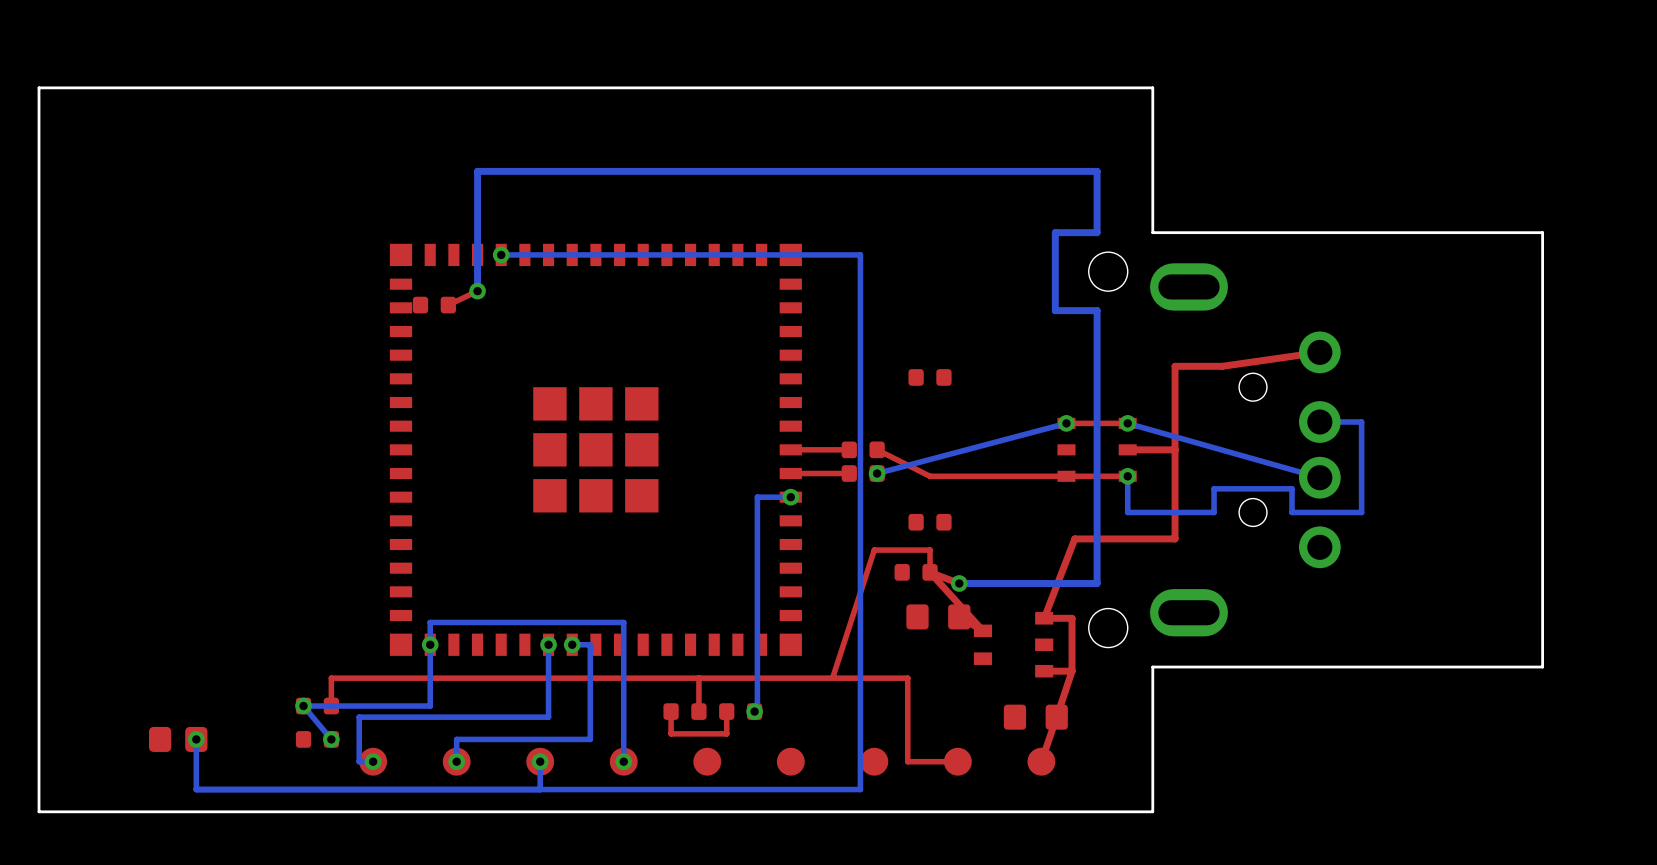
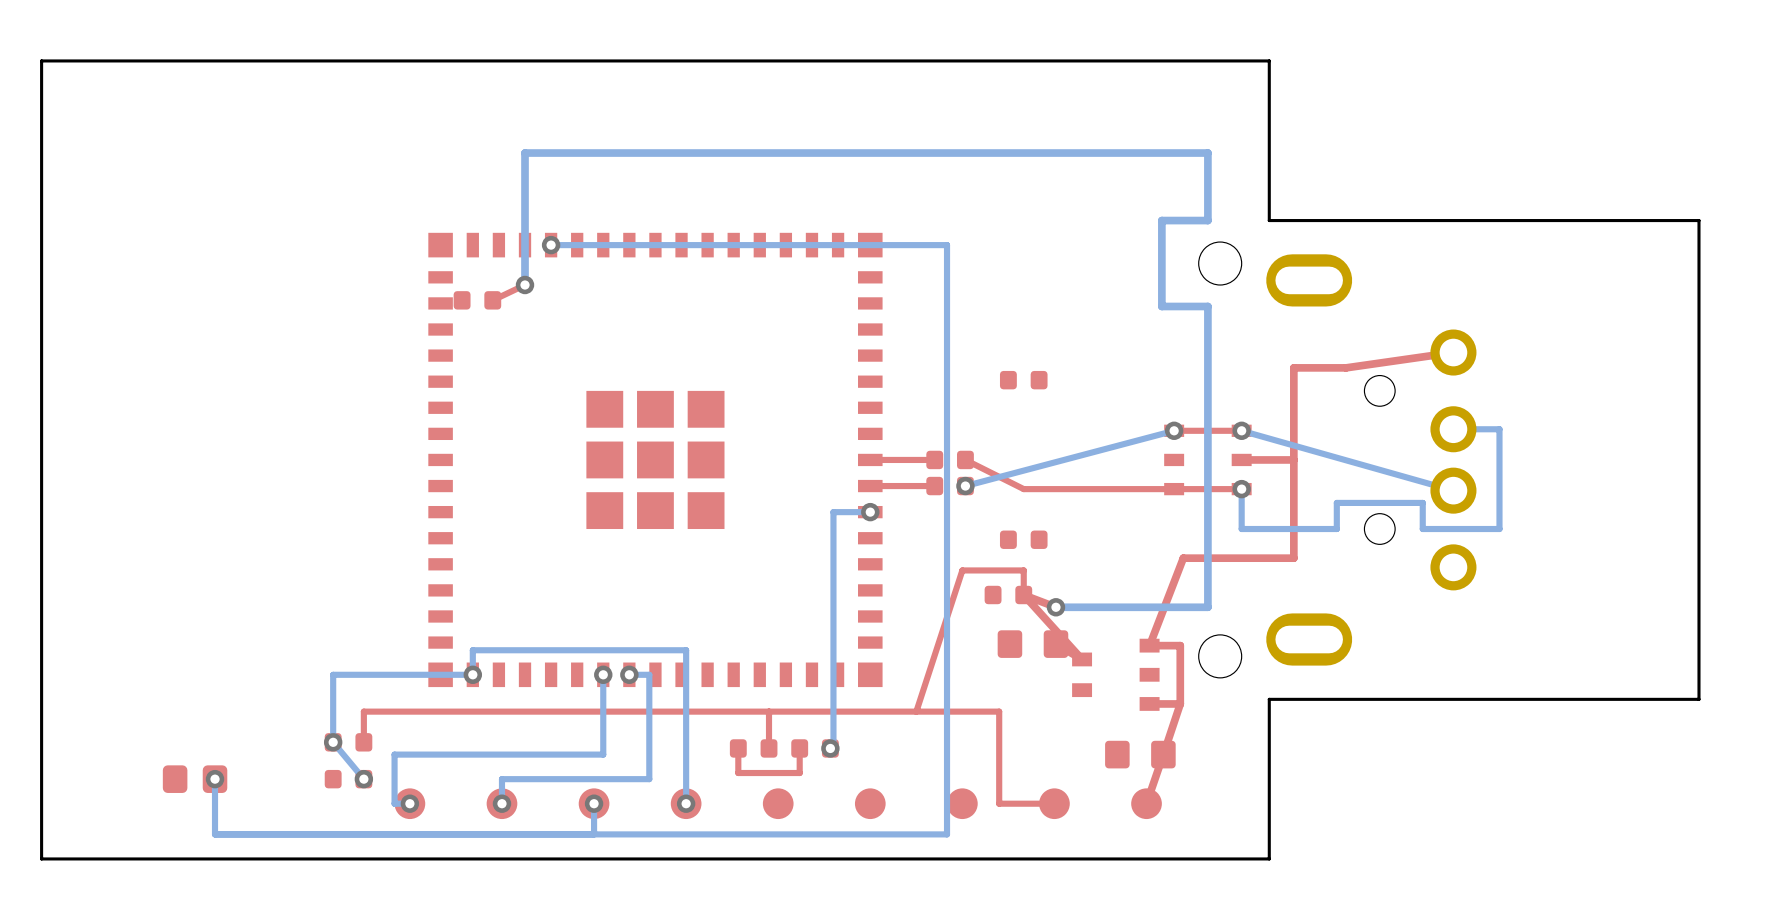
bottom track: (430, 644) (430, 706) (303, 706) -> (472, 674) (333, 674) (333, 742)

